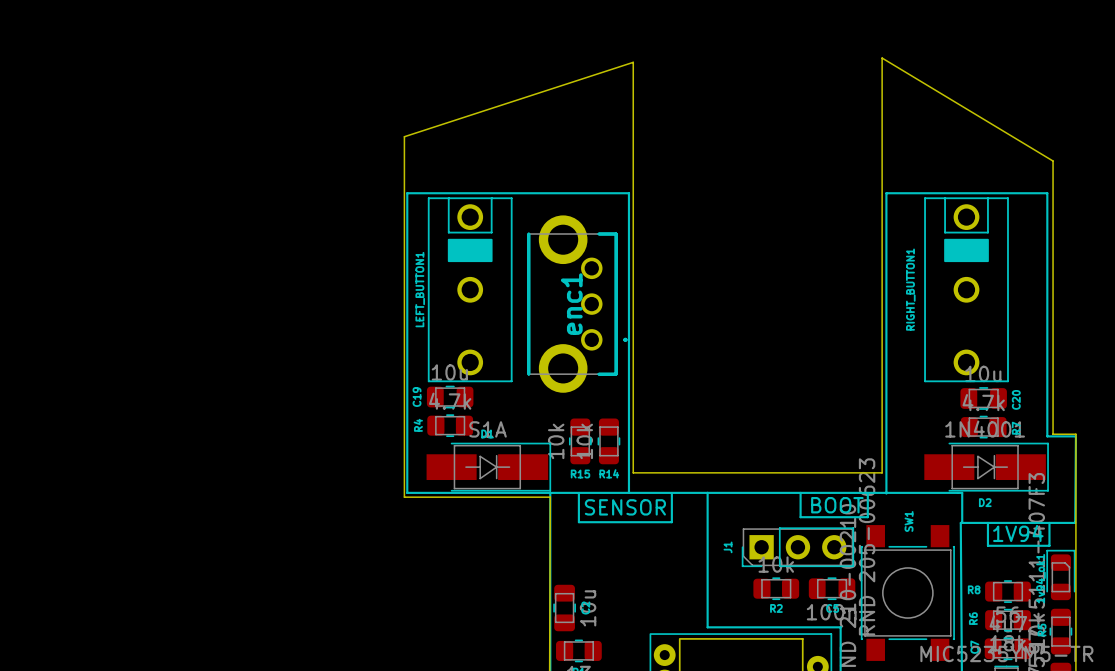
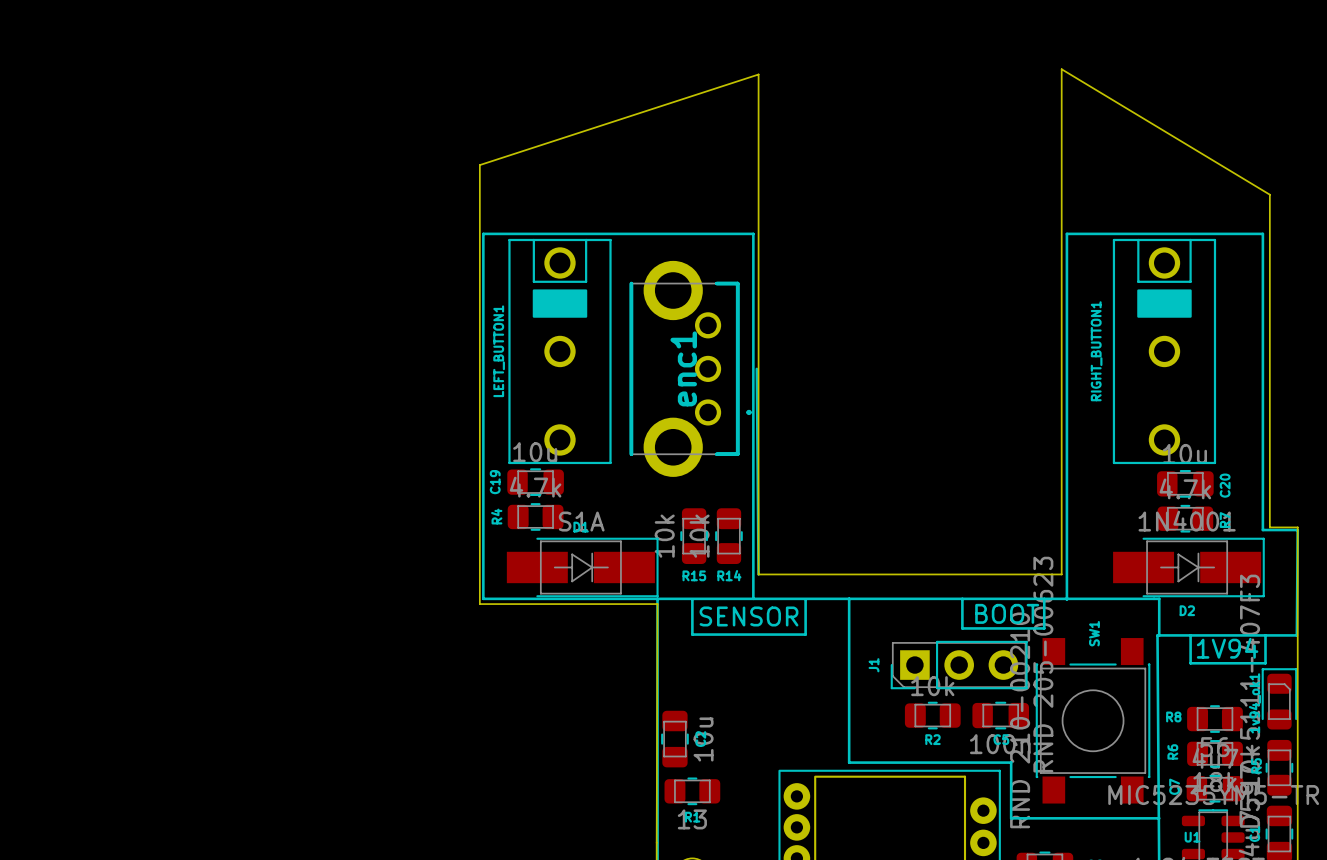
line: none -> (756, 368) (758, 574)

